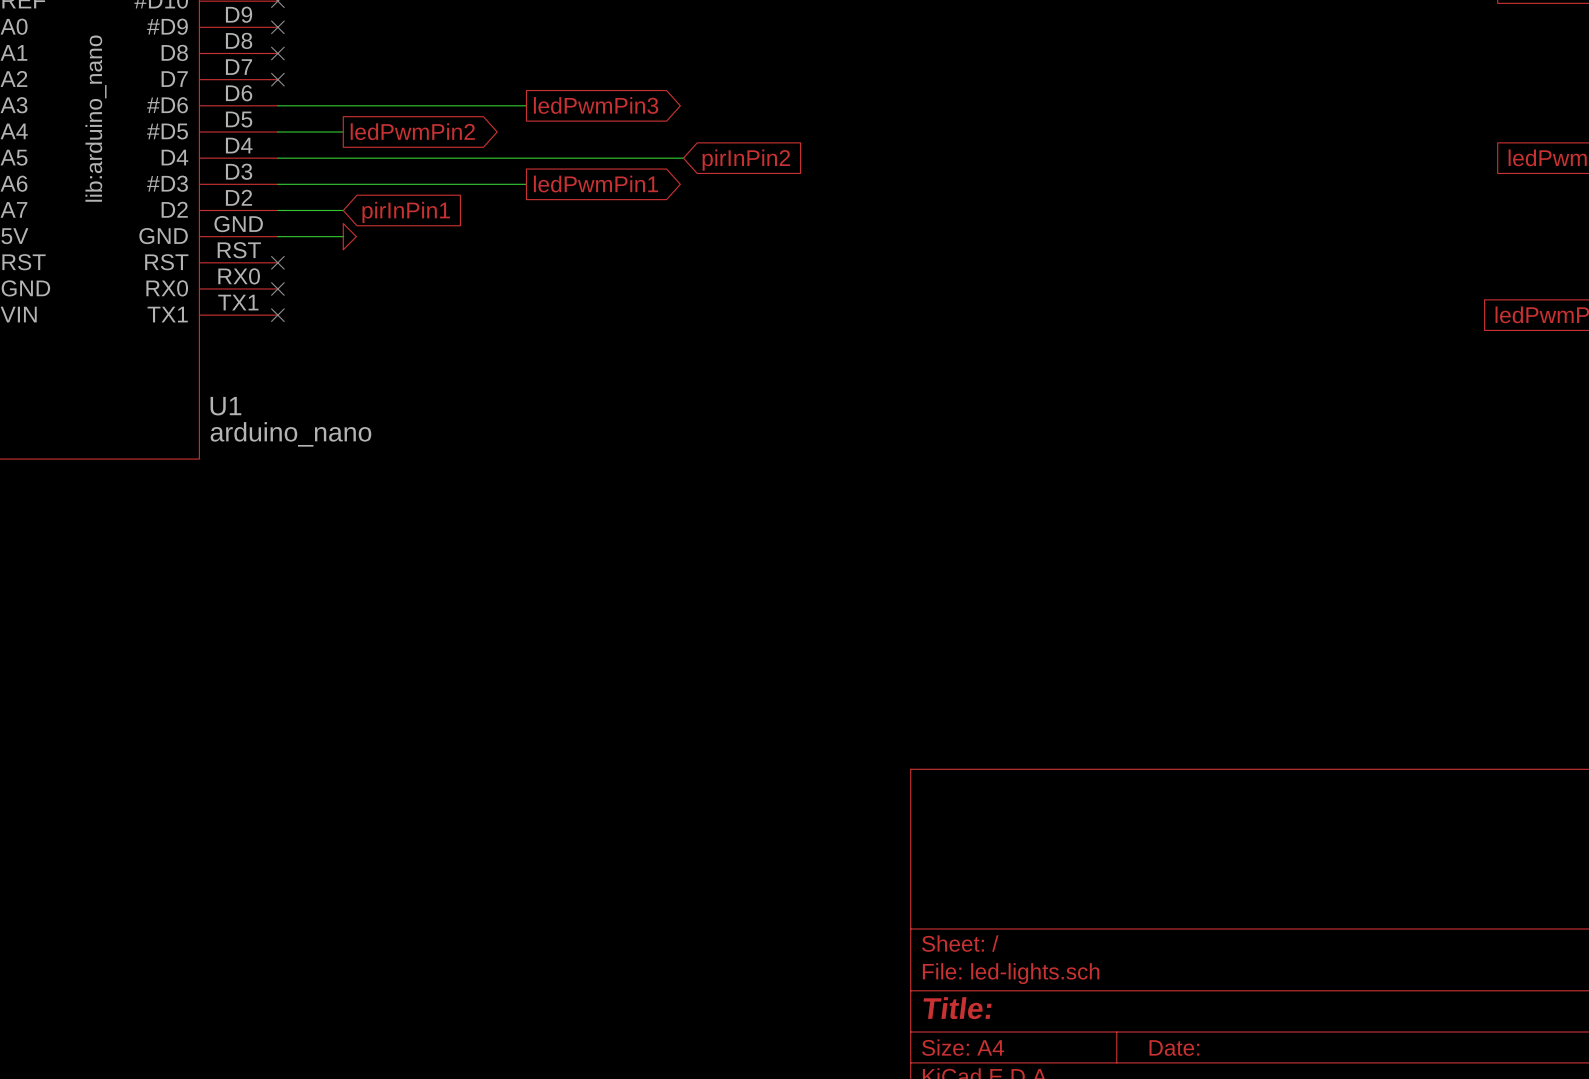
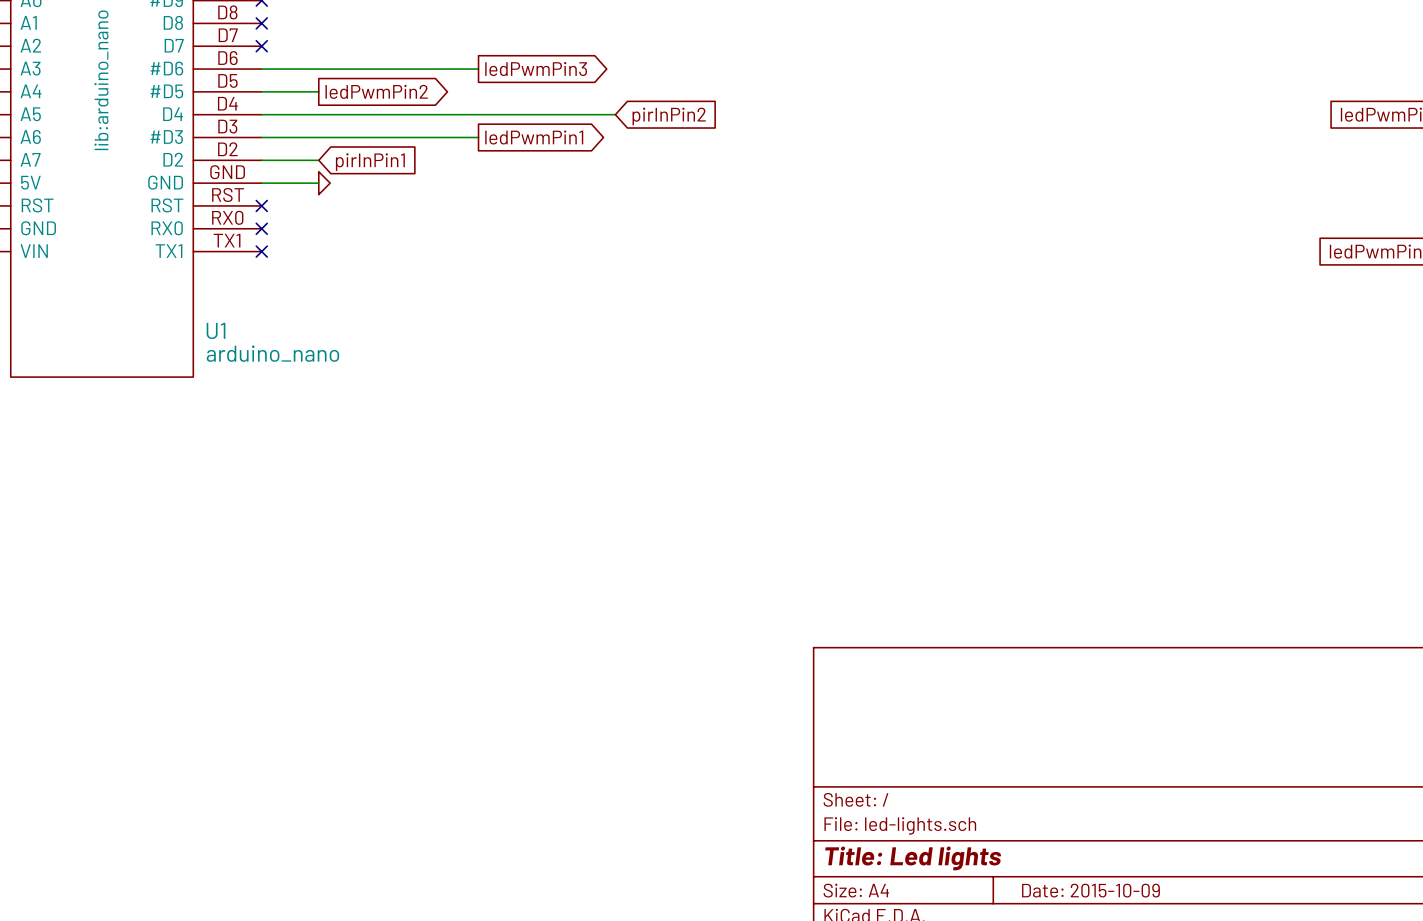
title block: Title: (957, 1008) -> Title: Led lights (913, 858)
title block: Date: (1174, 1048) -> Date: 2015-10-09 (1090, 890)

